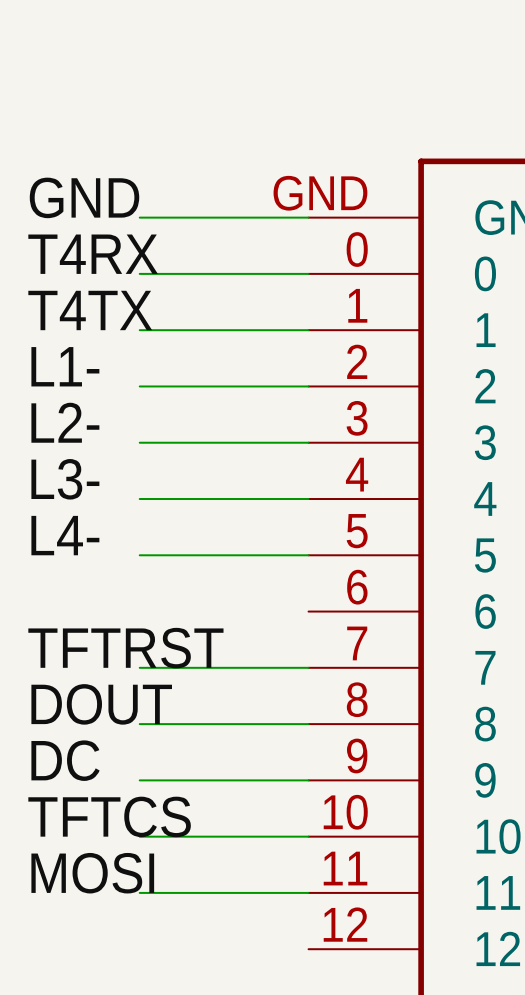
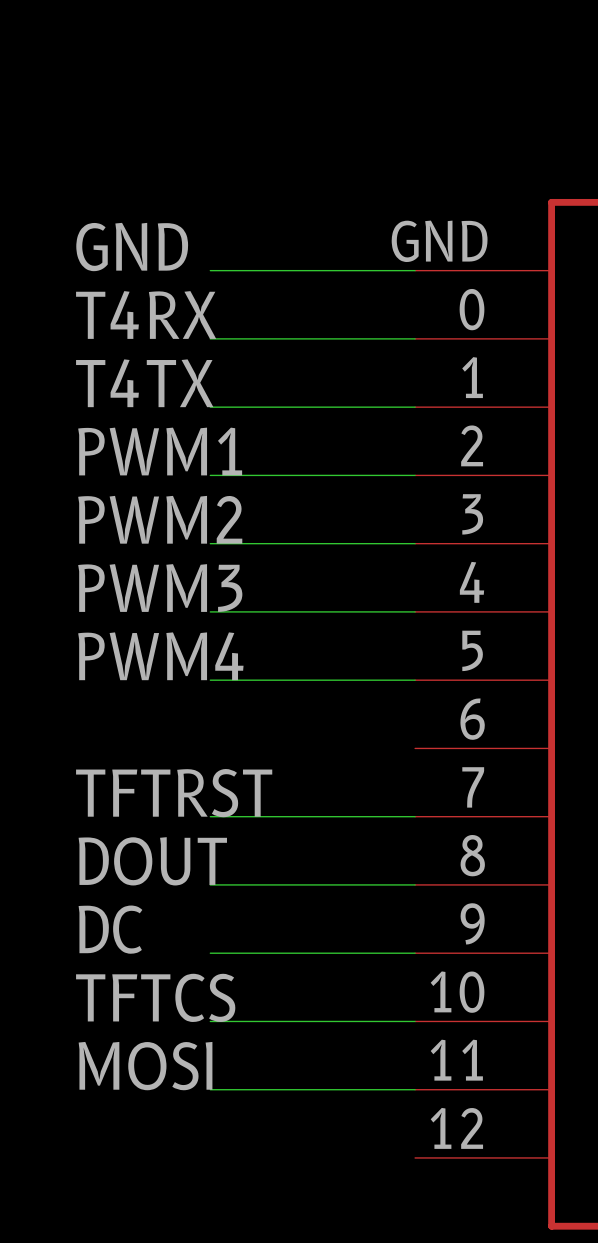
label: L1- (65, 366) -> PWM1 (160, 451)
label: L2- (65, 422) -> PWM2 (160, 519)
label: L3- (65, 479) -> PWM3 (160, 588)
label: L4- (65, 535) -> PWM4 (160, 656)

